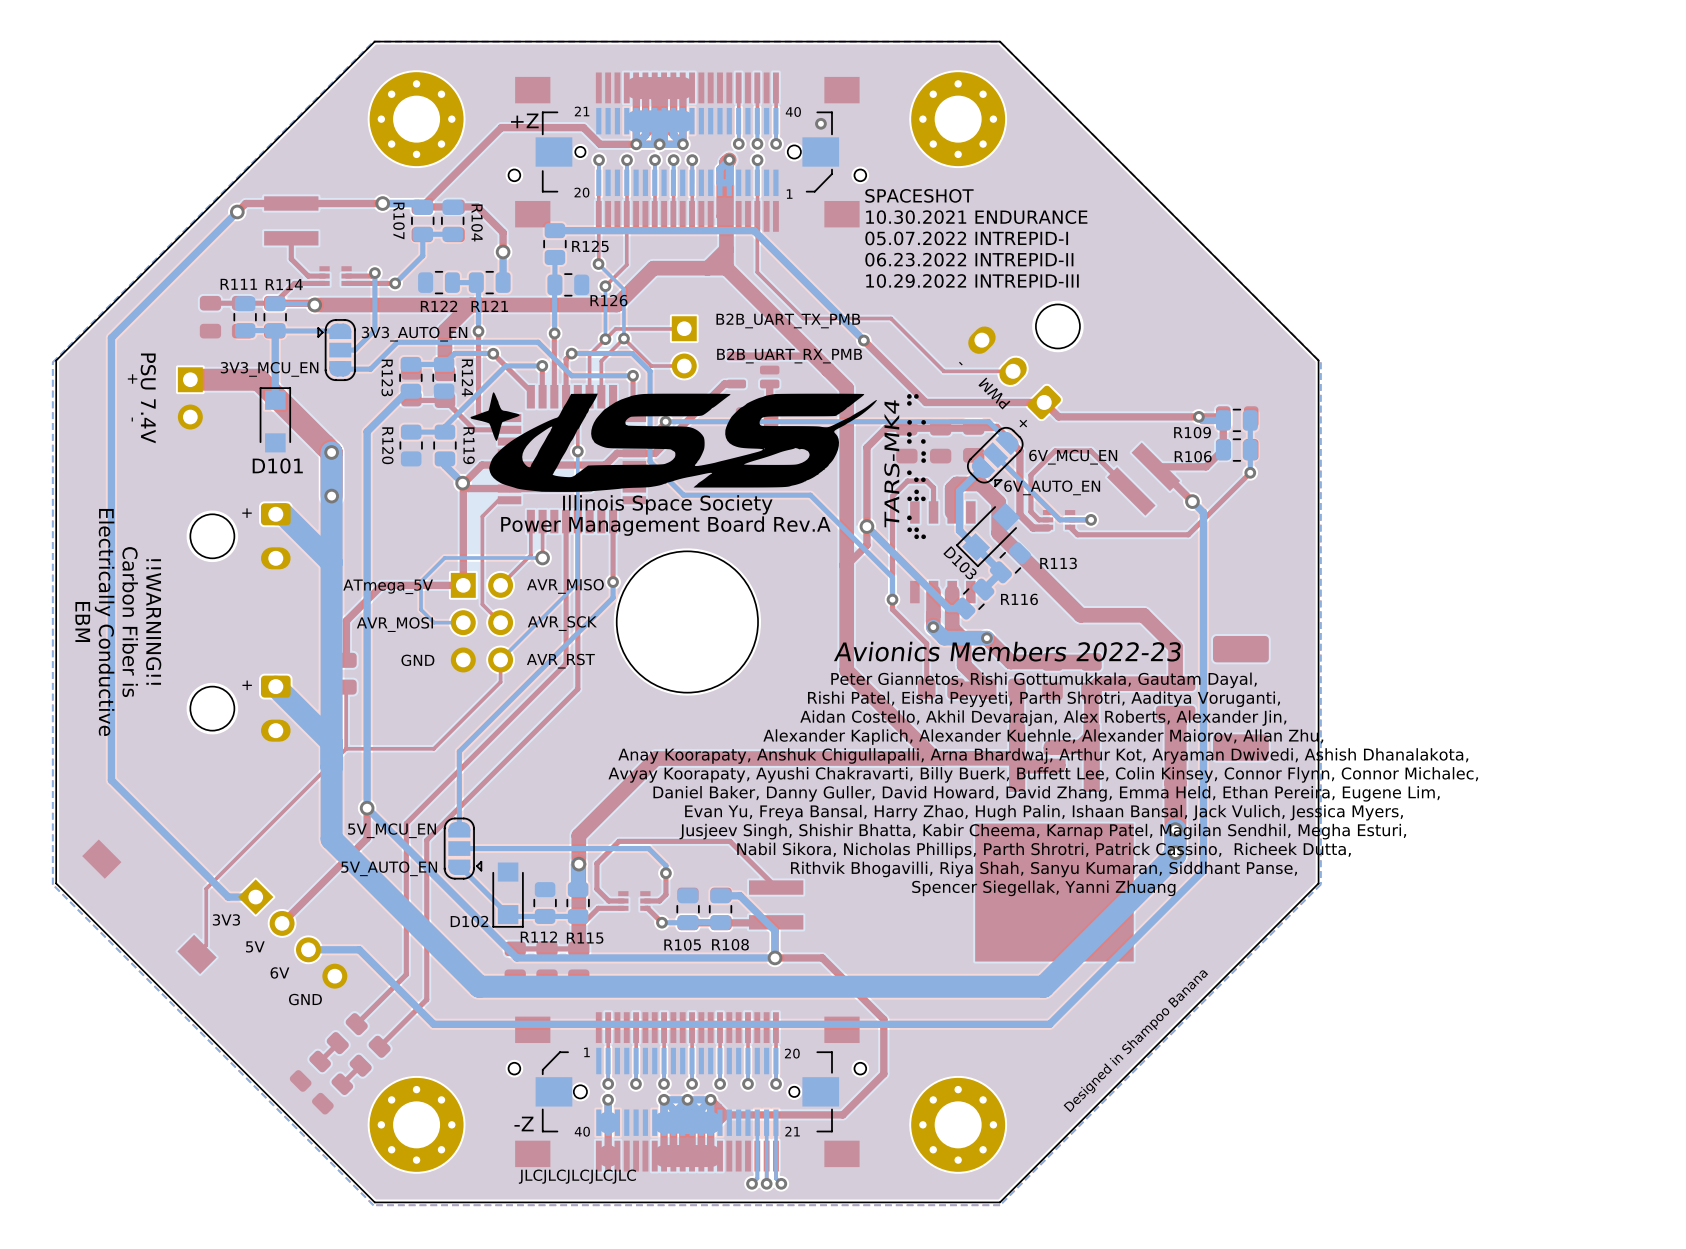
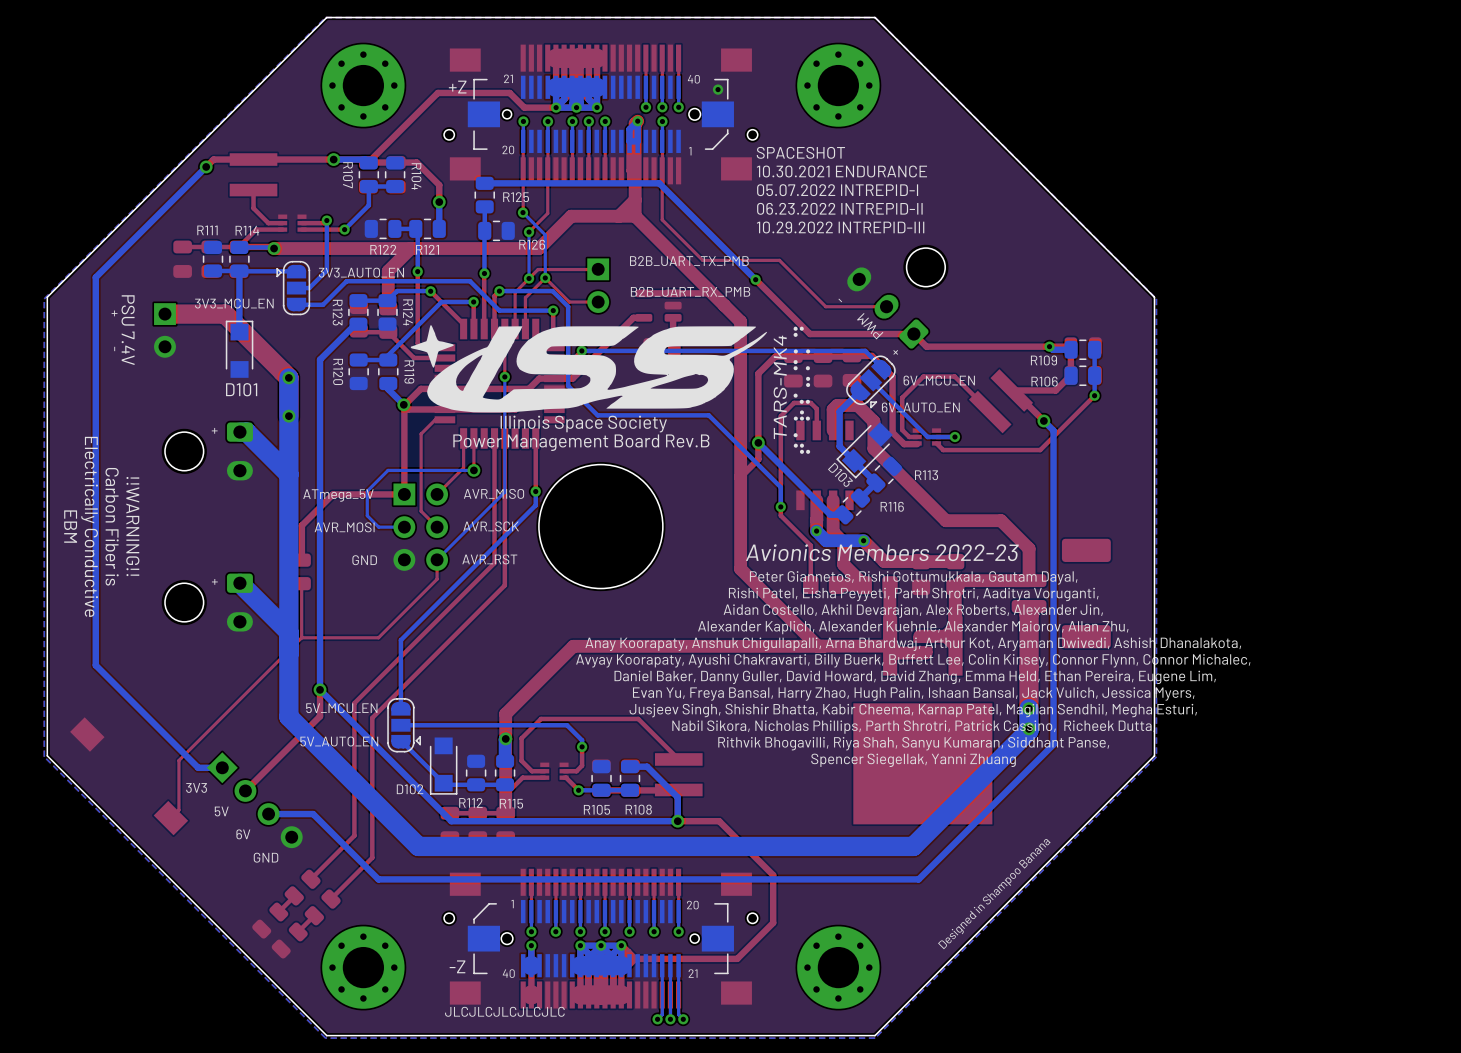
text: Power Management Board Rev.A (665, 526) -> Power Management Board Rev.B (581, 442)

